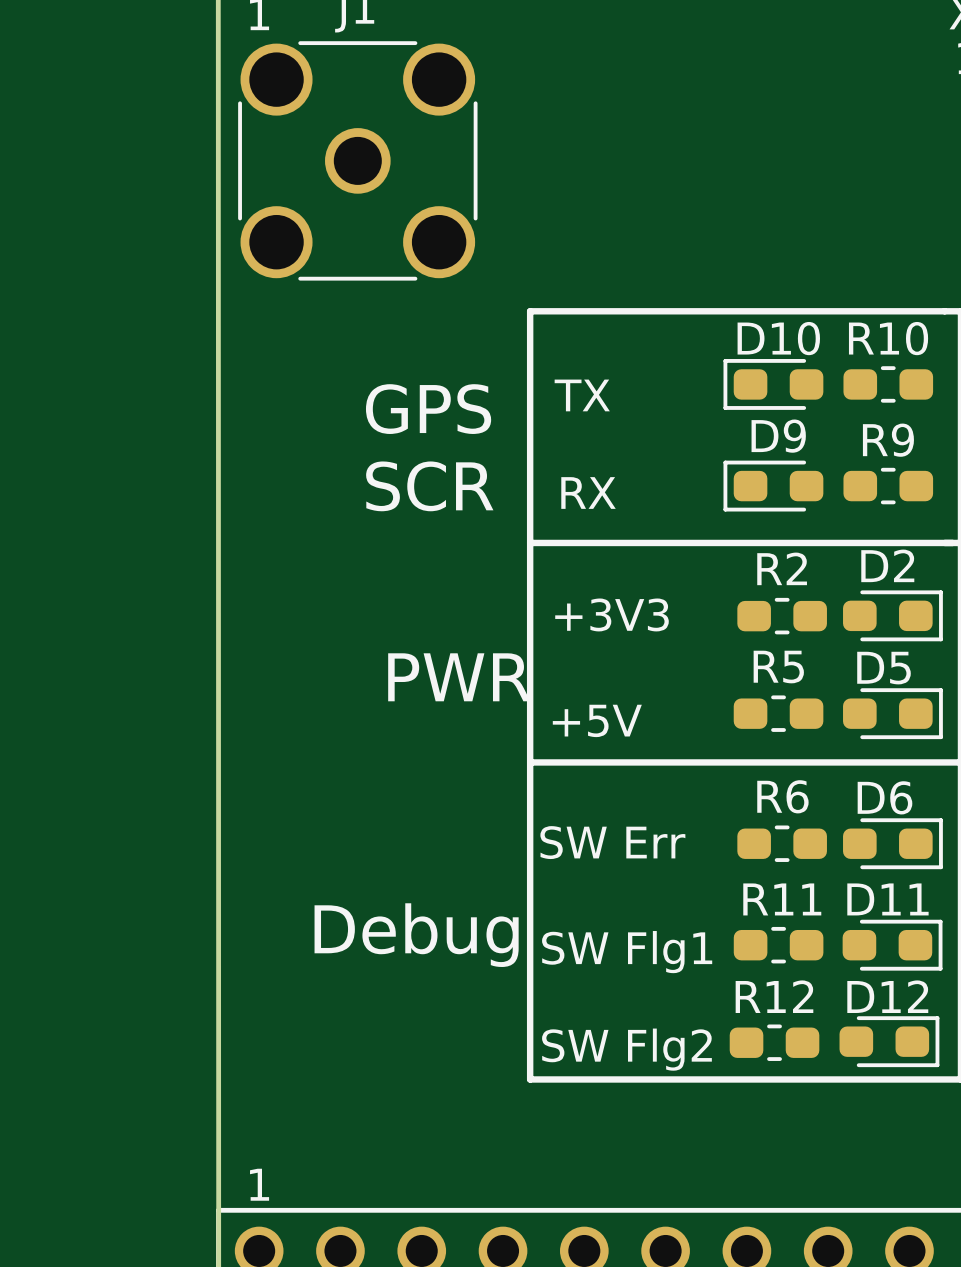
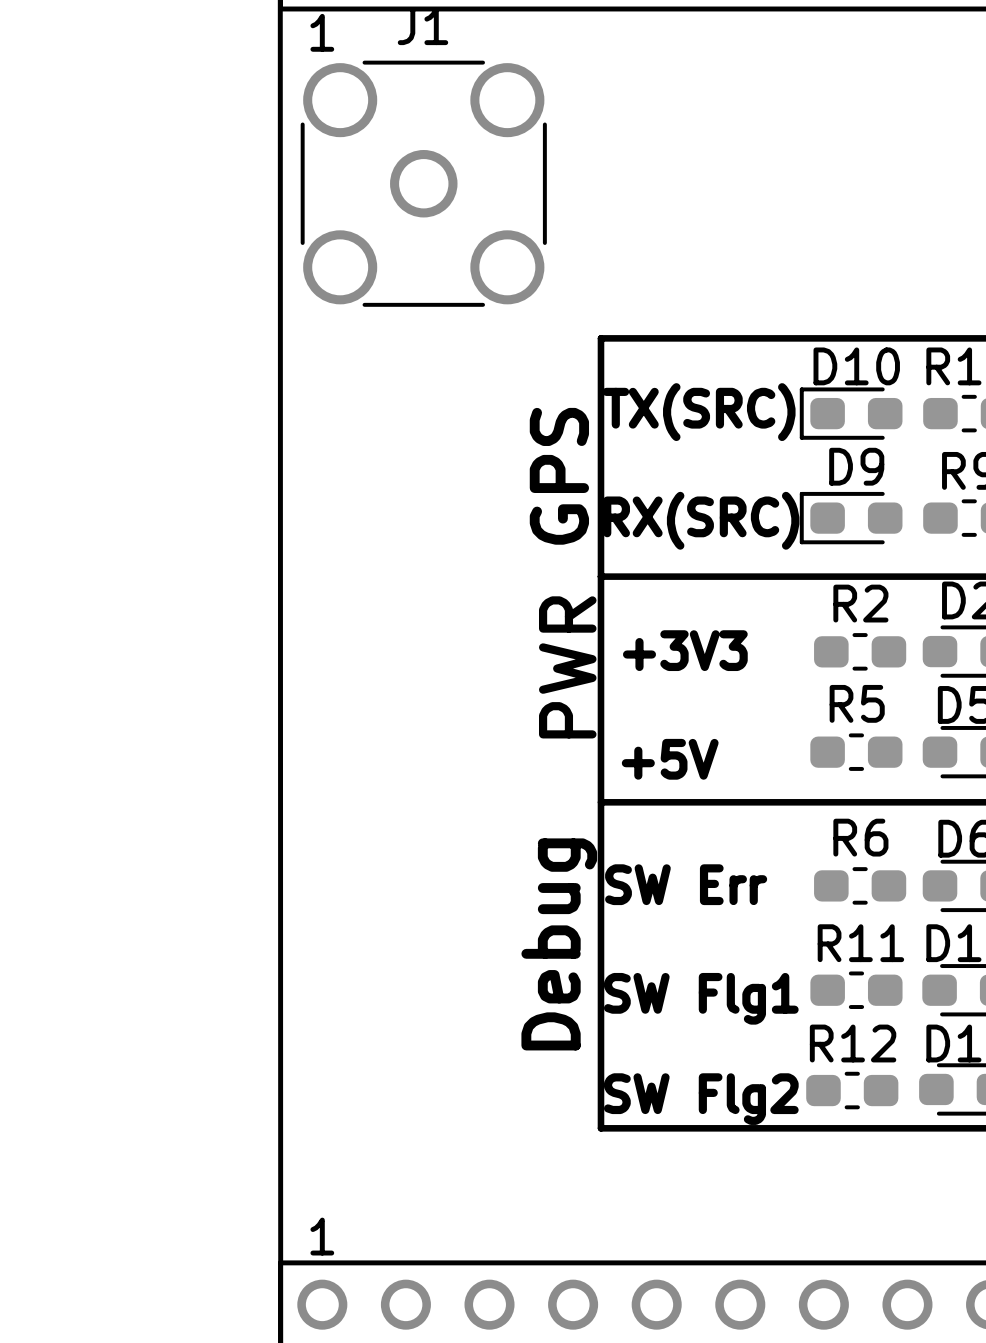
text: none -> TX(SRC) (698, 412)
text: TX (582, 395) -> none
text rotation: 0° (428, 409) -> 90° counterclockwise (559, 476)
text: SCR (429, 486) -> none
text: none -> RX(SRC) (701, 520)
text: RX (588, 493) -> none
text rotation: 0° (459, 677) -> 90° counterclockwise (567, 667)
text rotation: 0° (416, 935) -> 90° counterclockwise (559, 944)

